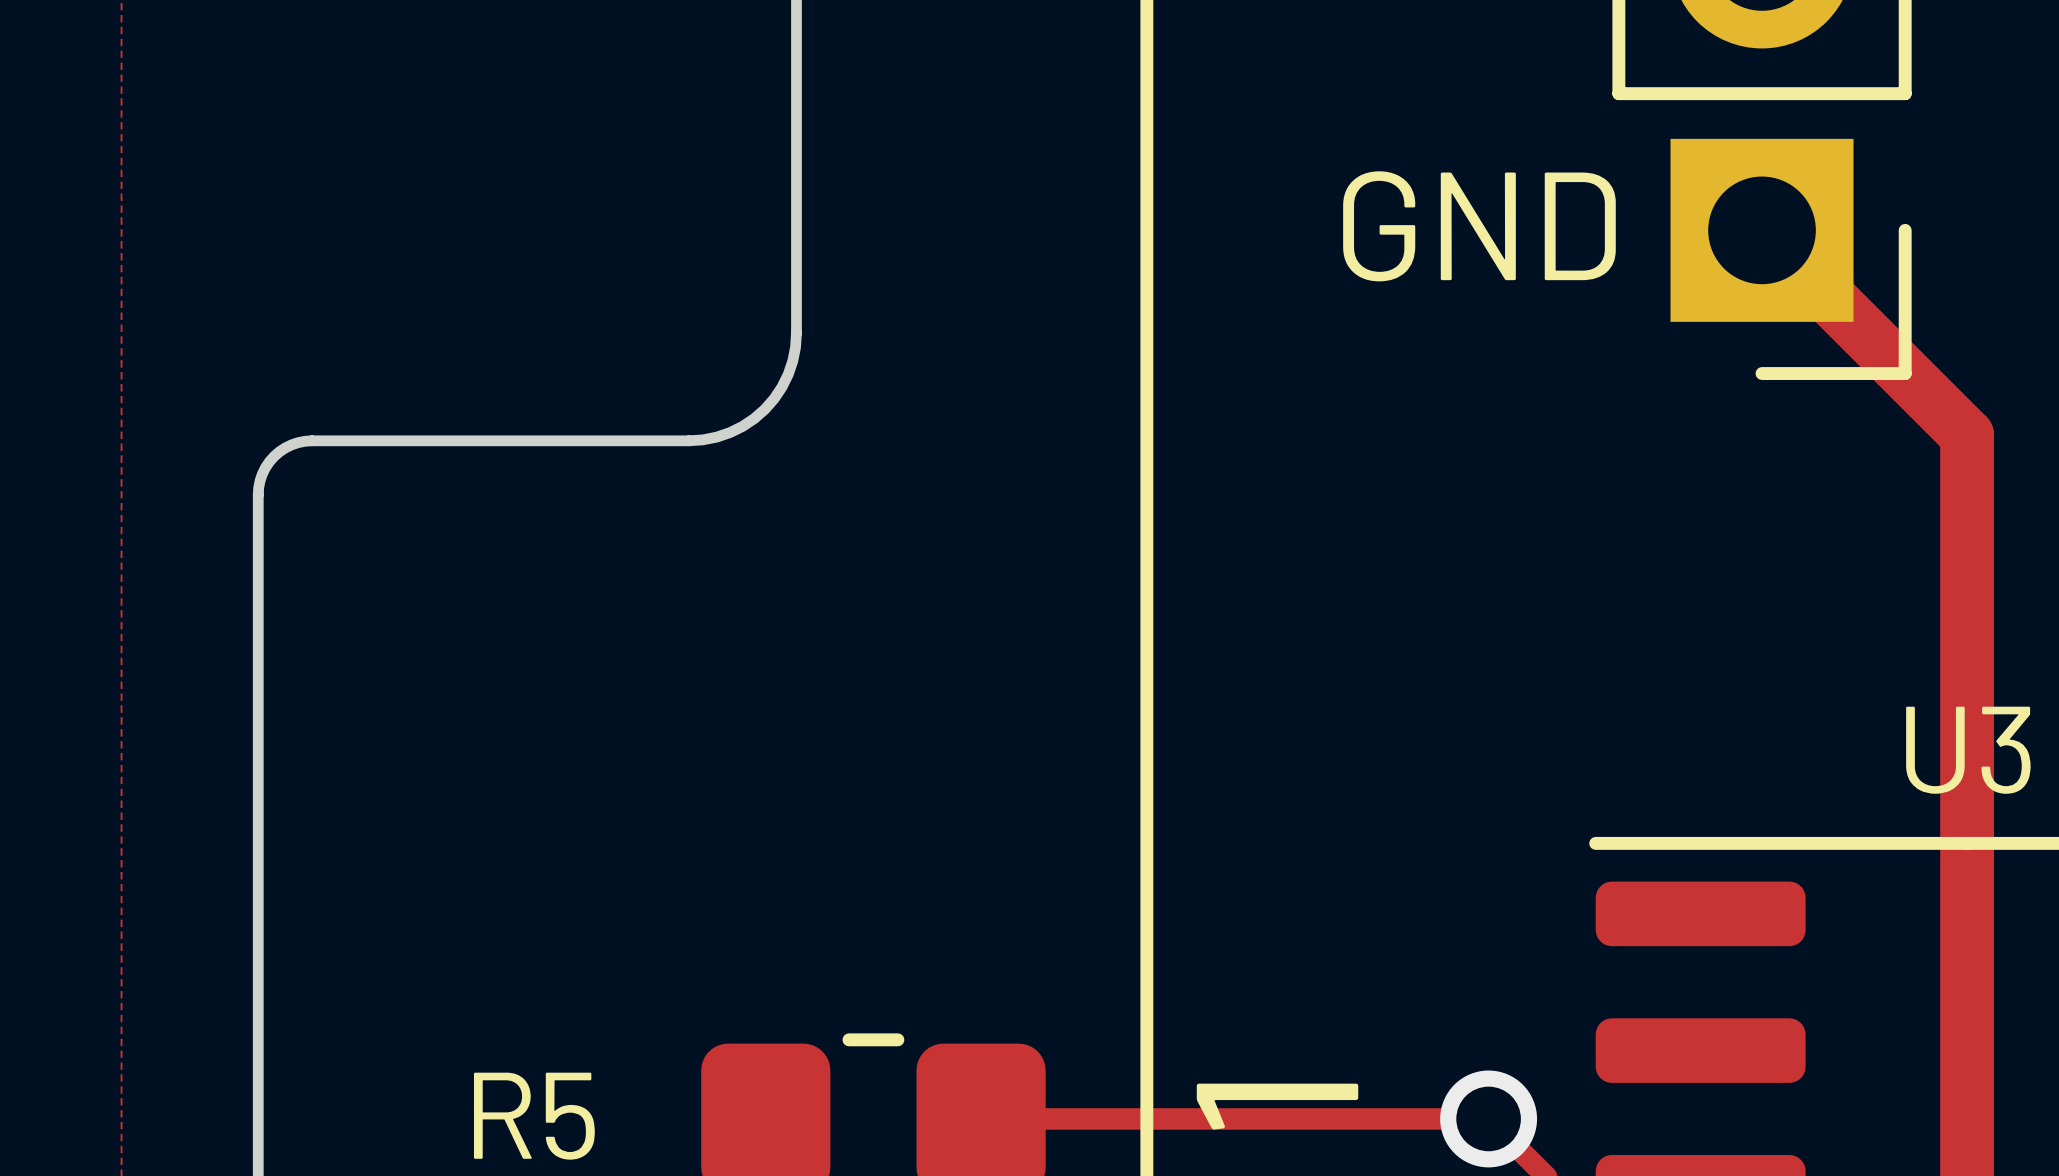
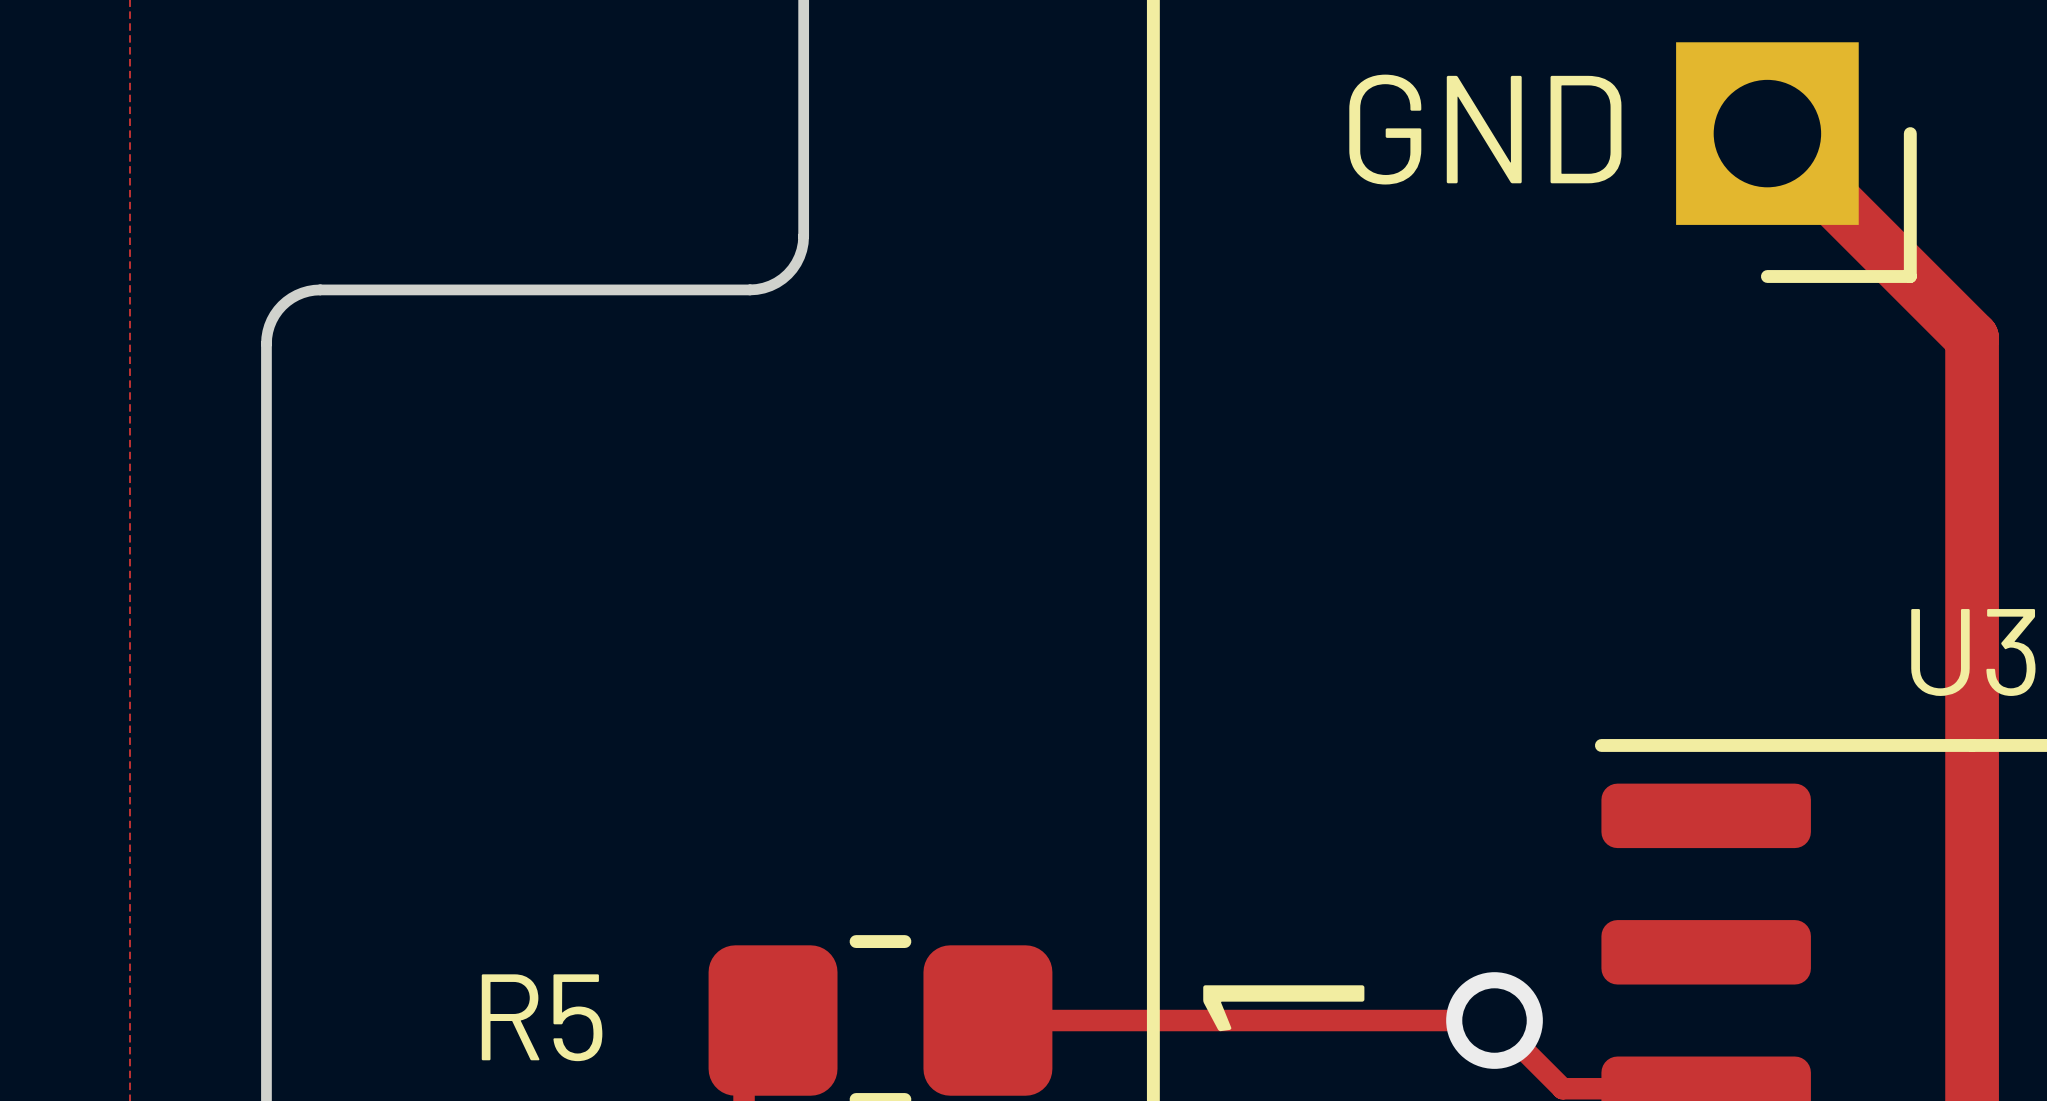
board edge: (796, 333) (792, 361) (788, 374) (774, 398) (754, 418) (730, 432) (716, 437) (688, 440) (305, 441) (285, 448) (269, 461) (262, 474) (258, 494) -> (803, 236) (799, 256) (792, 268) (776, 282) (756, 289) (320, 289) (302, 292) (282, 305) (269, 325) (266, 343) (266, 397)

